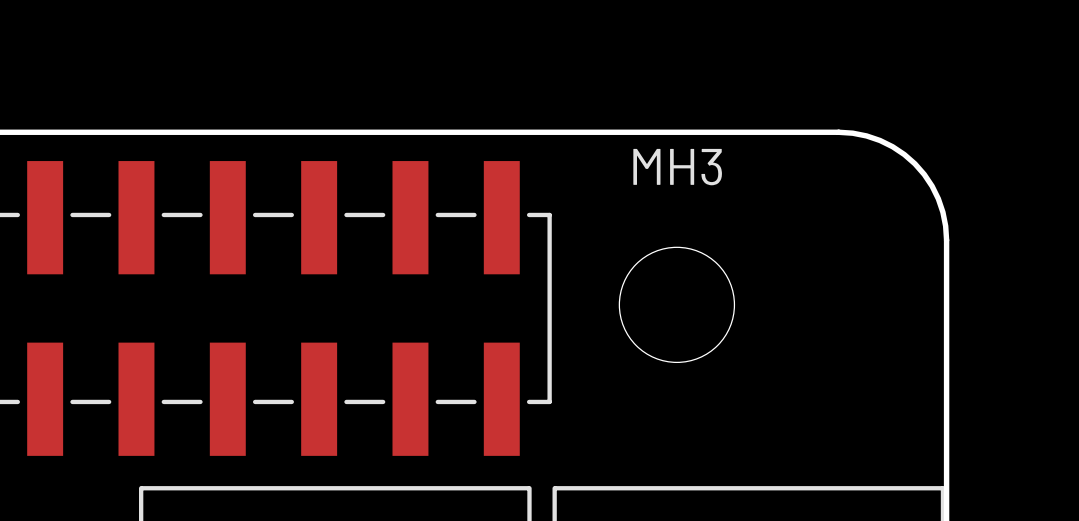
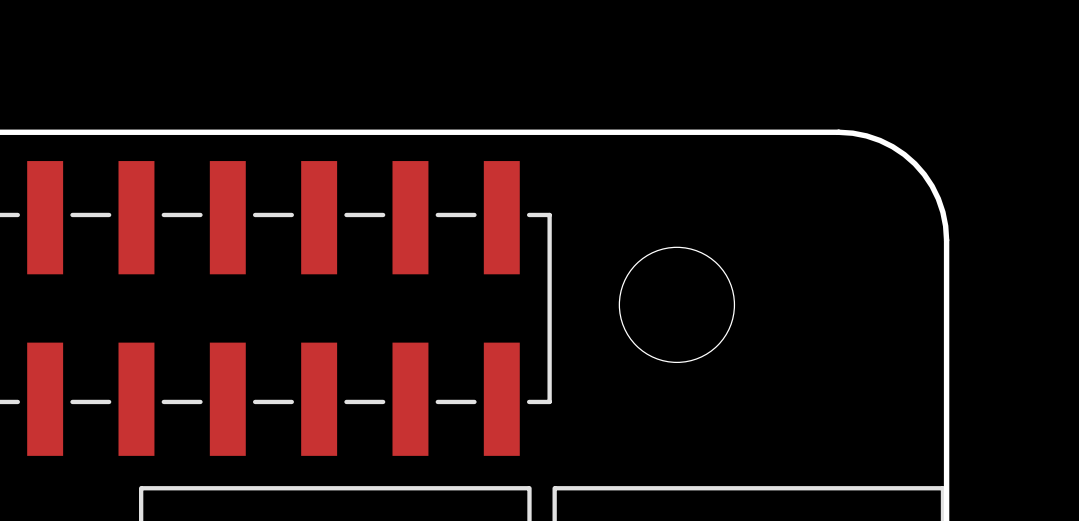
MH3 name: MH3 (677, 167) -> none

